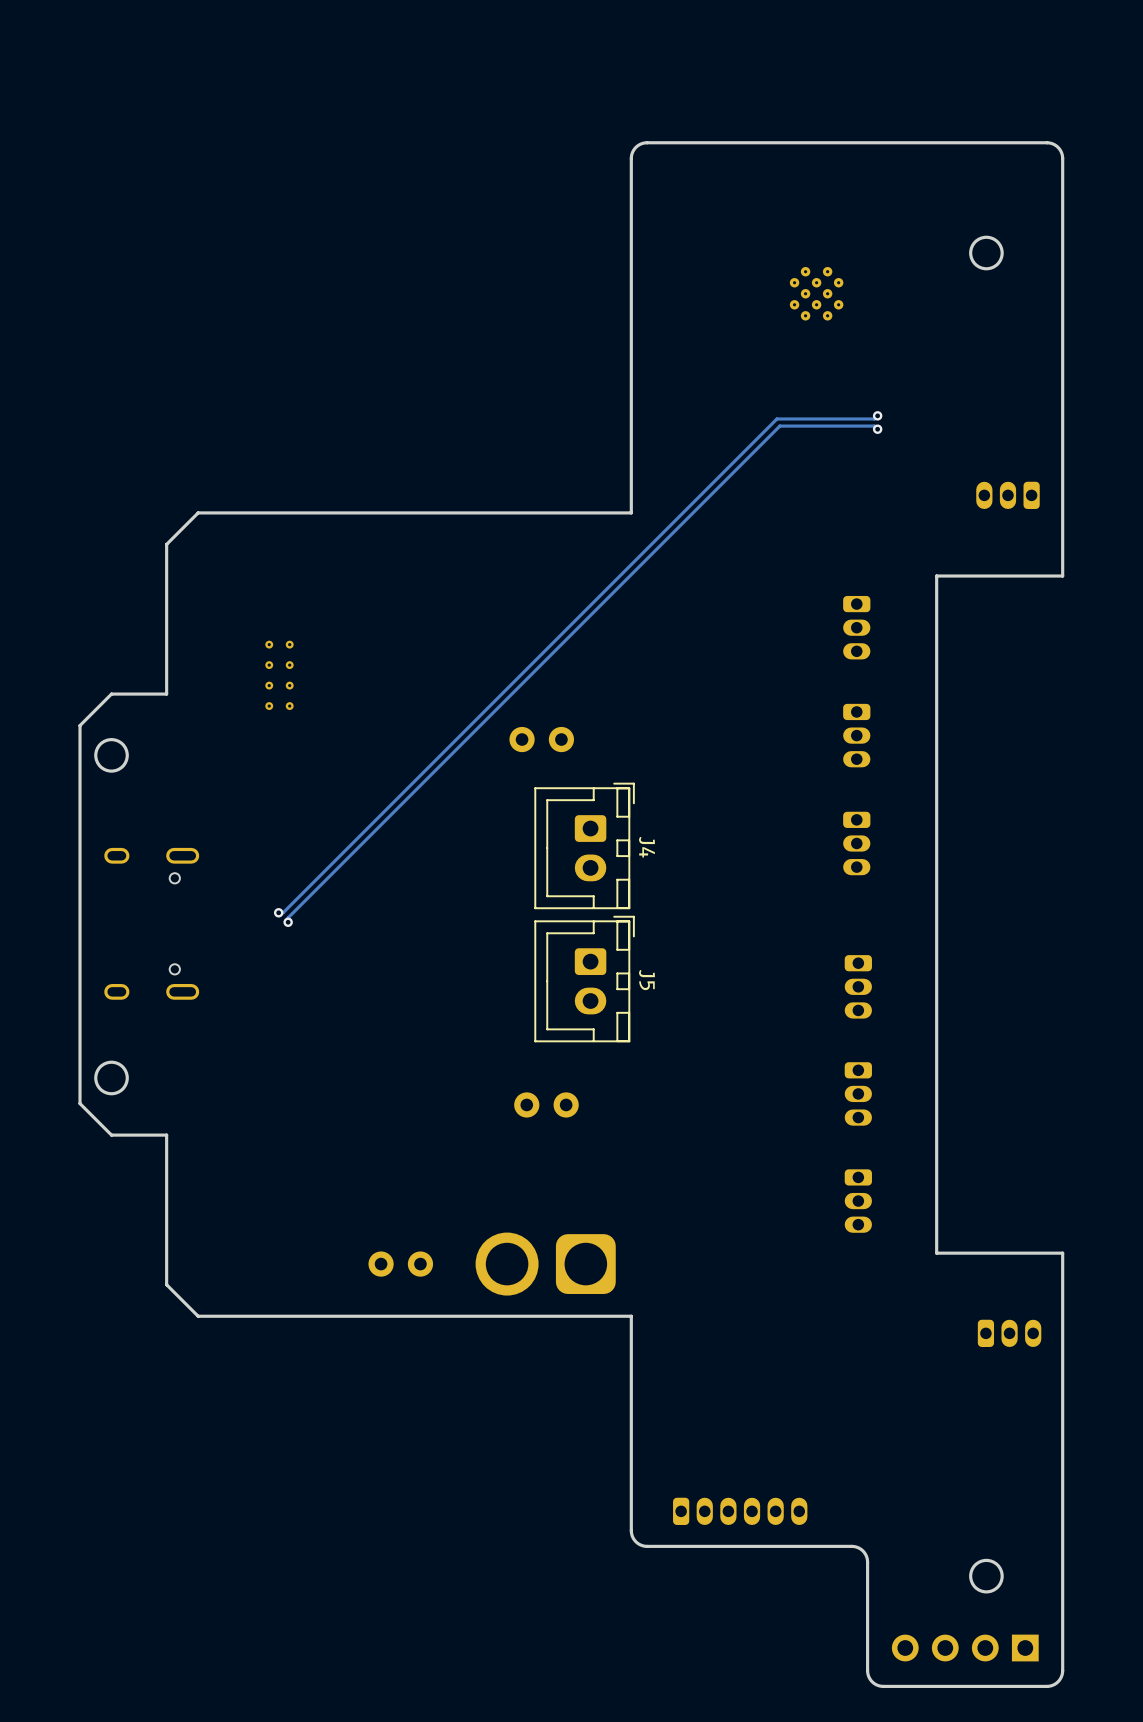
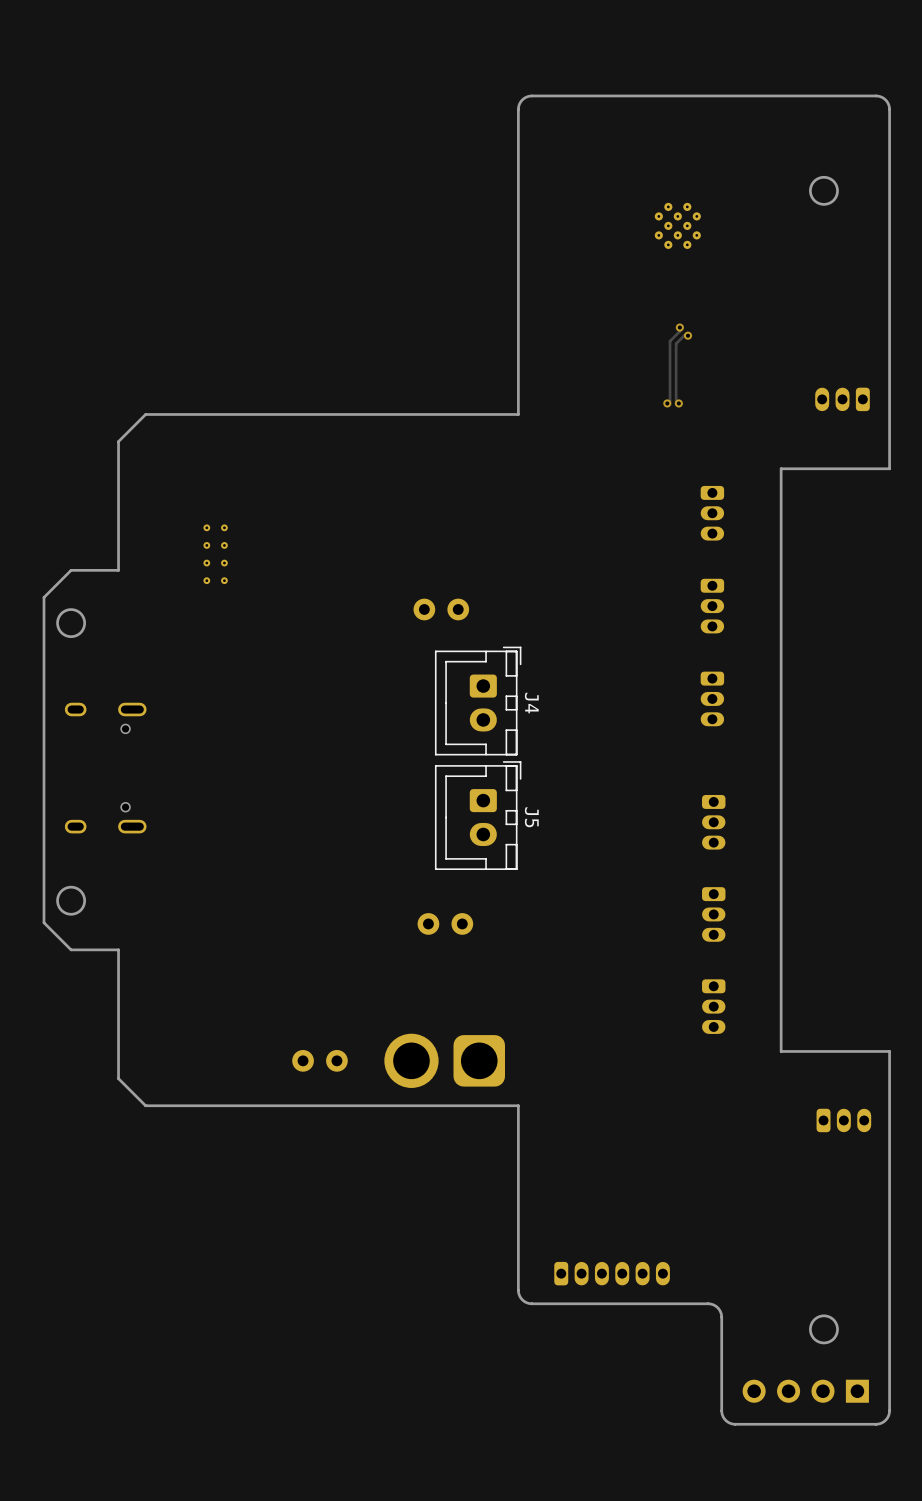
track: none -> (679, 327) (679, 331) (670, 341) (670, 400) (667, 403)
via: none -> (679, 327)
track: (877, 415) (874, 418) (776, 418) (283, 912) (278, 912) -> none
via: (877, 415) -> none
track: none -> (688, 335) (684, 335) (676, 343) (676, 400) (678, 403)
via: none -> (688, 335)
track: (877, 429) (874, 426) (779, 426) (288, 917) (288, 922) -> none
via: (877, 429) -> none
via: none -> (667, 403)
via: none -> (678, 403)
via: (278, 912) -> none
via: (288, 922) -> none

